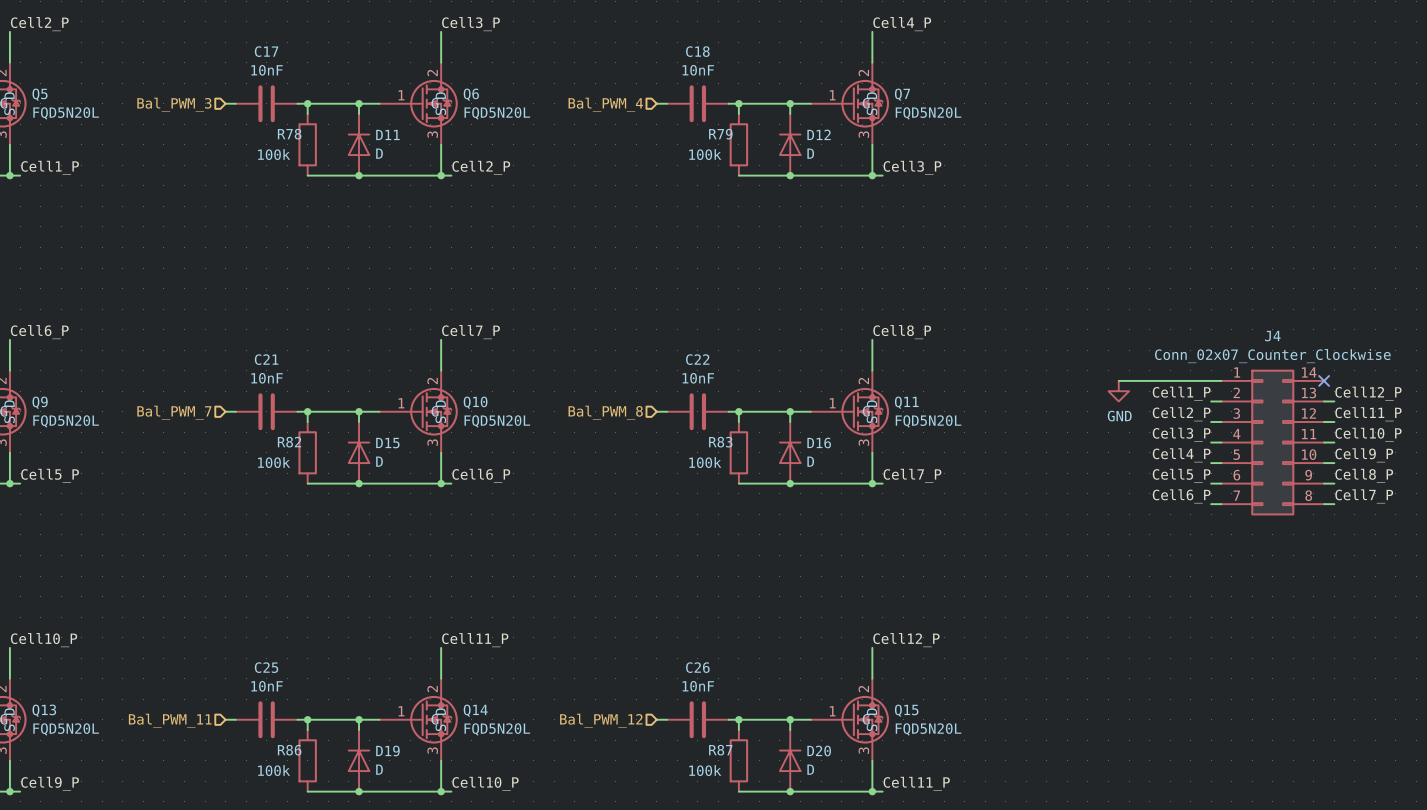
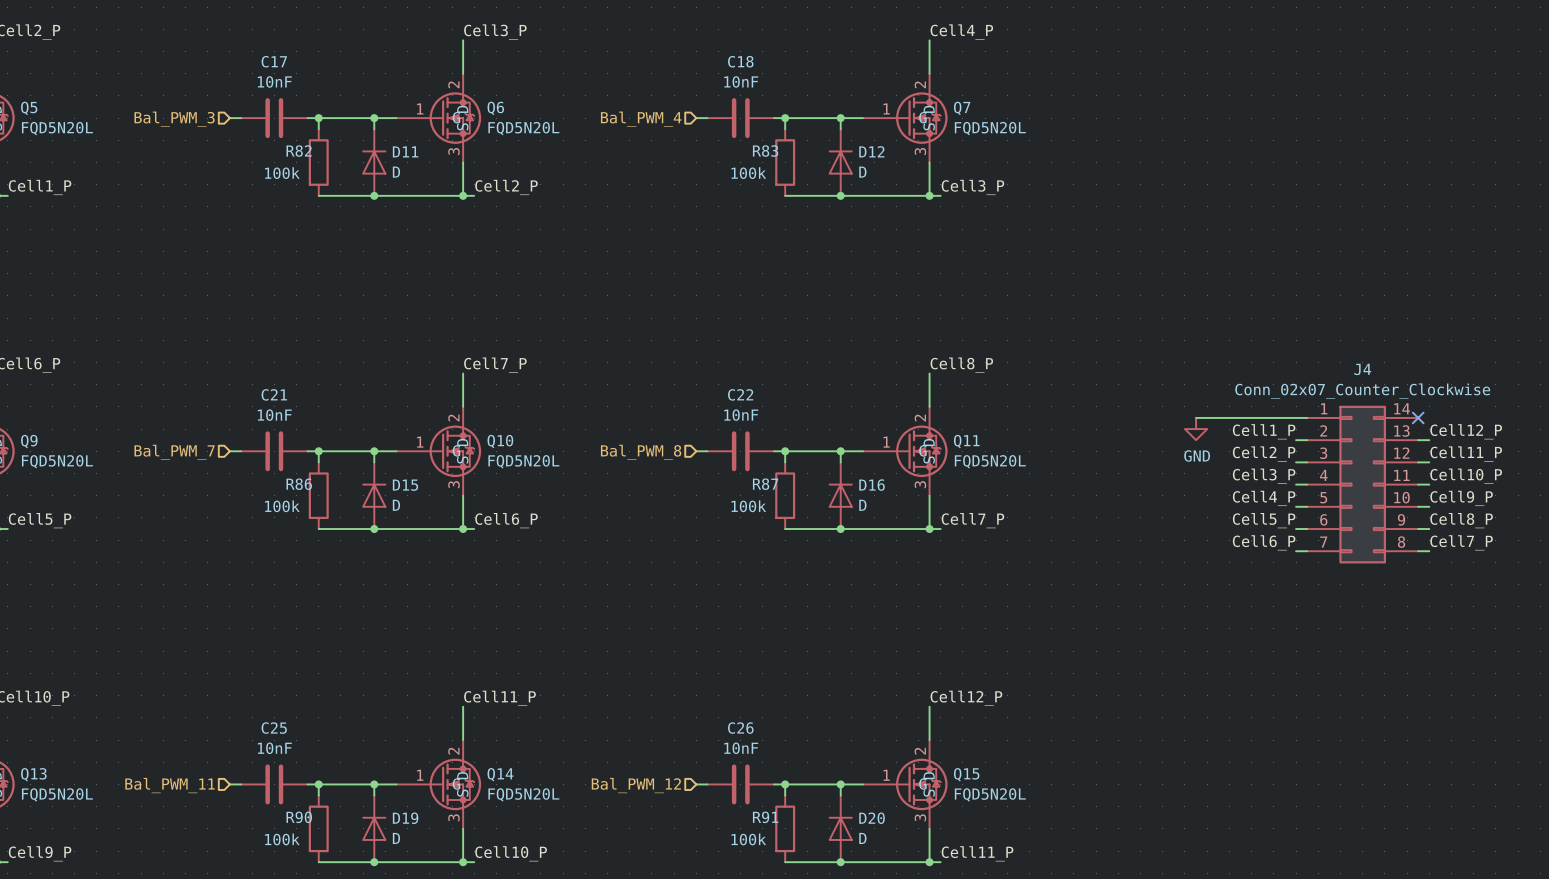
R78 name: R78 (289, 134) -> R82 (299, 151)
R79 name: R79 (720, 134) -> R83 (765, 151)
R82 name: R82 (289, 442) -> R86 (299, 484)
R83 name: R83 (720, 442) -> R87 (765, 484)
R86 name: R86 (289, 750) -> R90 (299, 817)
R87 name: R87 (720, 750) -> R91 (765, 817)

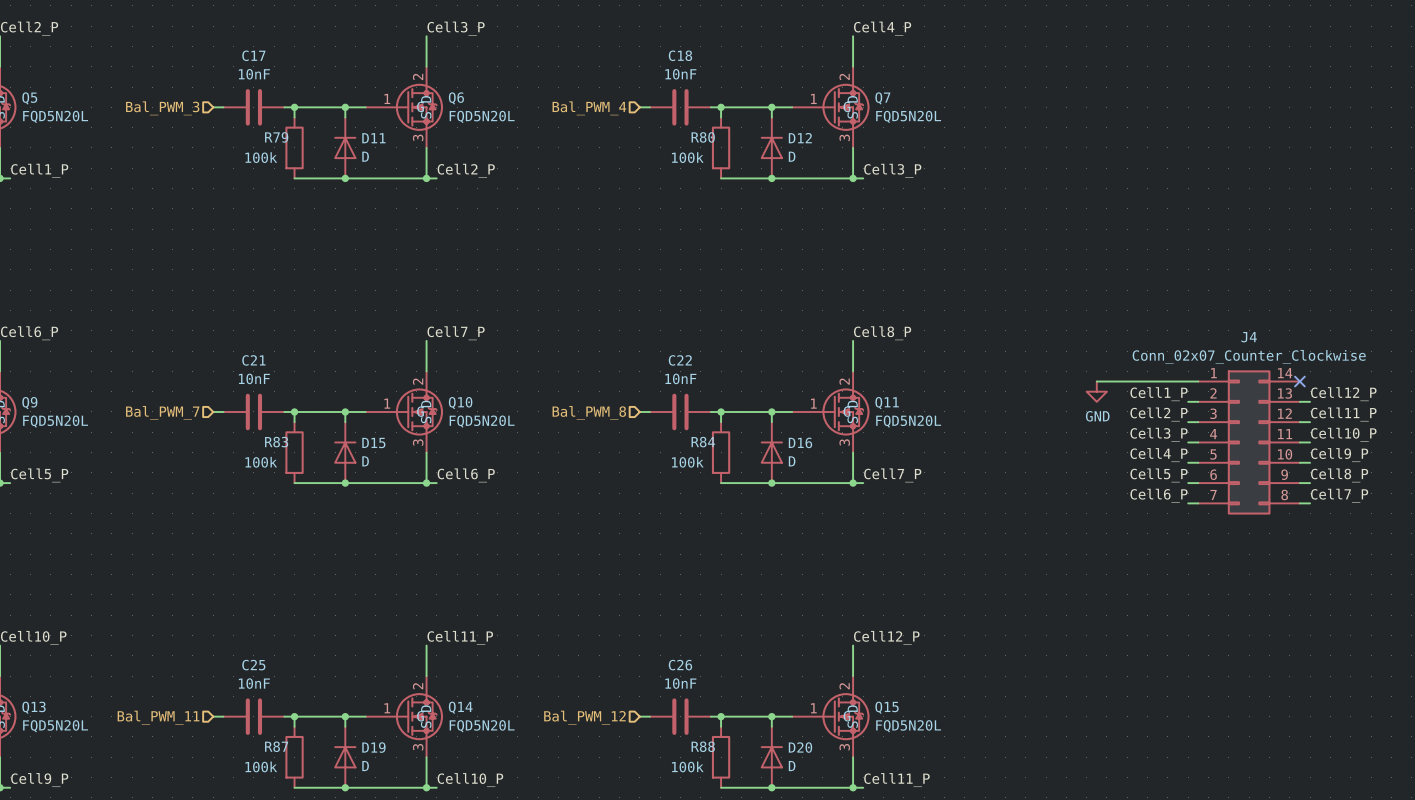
R82 name: R82 (299, 151) -> R79 (276, 137)
R83 name: R83 (765, 151) -> R80 (703, 137)
R86 name: R86 (299, 484) -> R83 (276, 442)
R87 name: R87 (765, 484) -> R84 (703, 442)
R90 name: R90 (299, 817) -> R87 (276, 746)
R91 name: R91 (765, 817) -> R88 (703, 746)

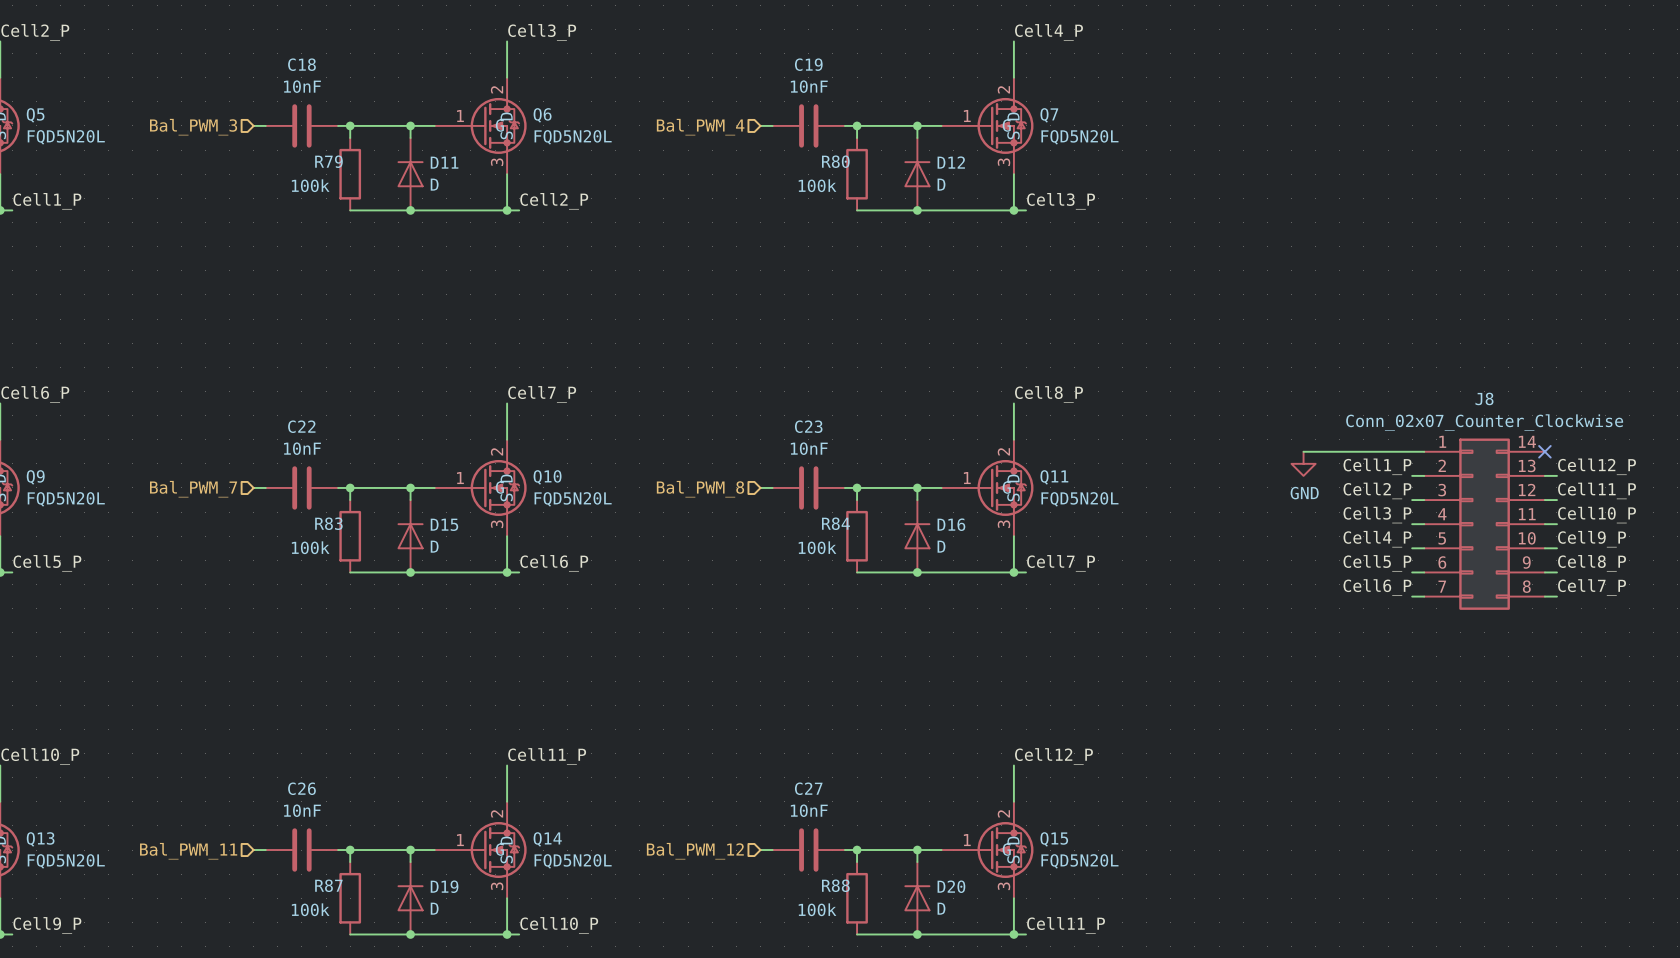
C17 name: C17 (253, 55) -> C18 (301, 64)
C18 name: C18 (680, 55) -> C19 (808, 64)
J4 name: J4 (1249, 337) -> J8 (1484, 398)
C21 name: C21 (253, 360) -> C22 (301, 426)
C22 name: C22 (680, 360) -> C23 (808, 426)
C25 name: C25 (253, 665) -> C26 (301, 788)
C26 name: C26 (680, 665) -> C27 (808, 788)

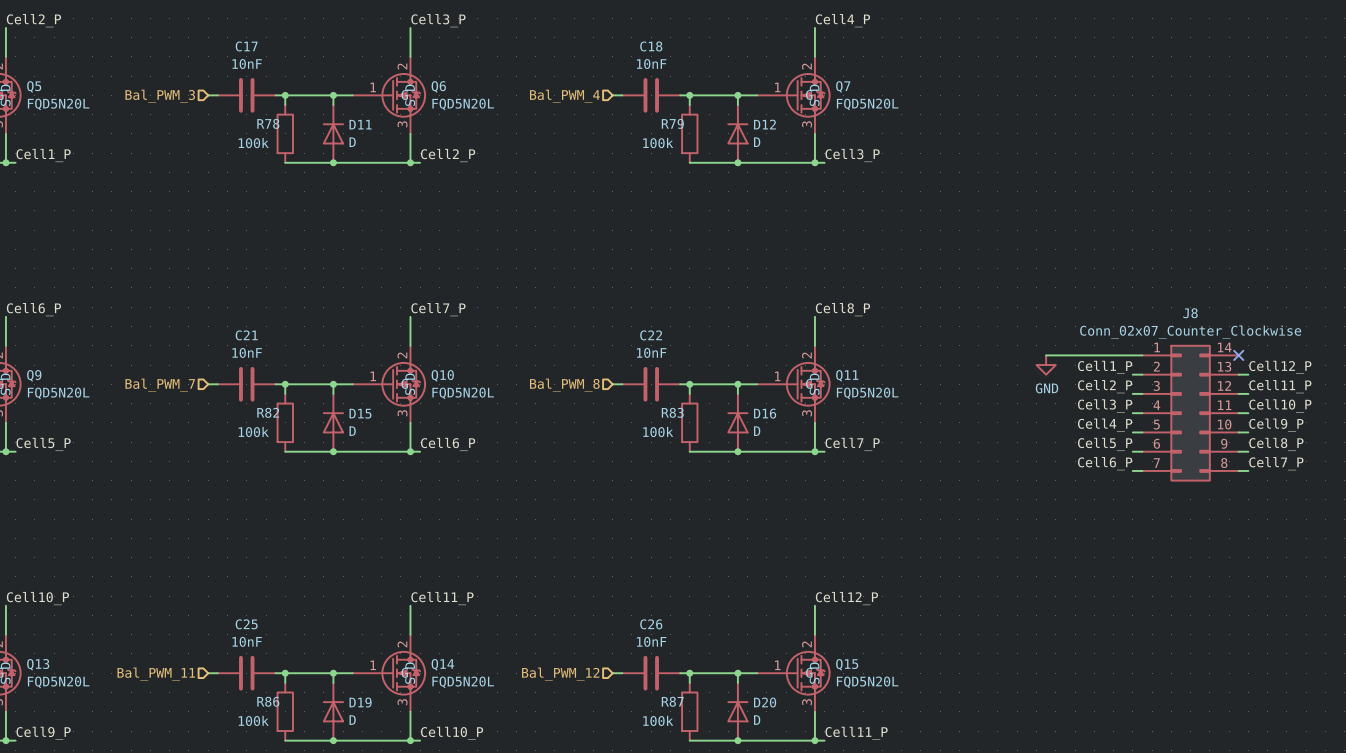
C18 name: C18 (301, 64) -> C17 (246, 46)
C19 name: C19 (808, 64) -> C18 (651, 46)
R79 name: R79 (328, 161) -> R78 (268, 123)
R80 name: R80 (835, 161) -> R79 (672, 123)
C22 name: C22 (301, 426) -> C21 (246, 335)
C23 name: C23 (808, 426) -> C22 (651, 335)
R83 name: R83 (328, 523) -> R82 (268, 412)
R84 name: R84 (835, 523) -> R83 (672, 412)
C26 name: C26 (301, 788) -> C25 (246, 624)
C27 name: C27 (808, 788) -> C26 (651, 624)
R87 name: R87 (328, 885) -> R86 (268, 701)
R88 name: R88 (835, 885) -> R87 (672, 701)

